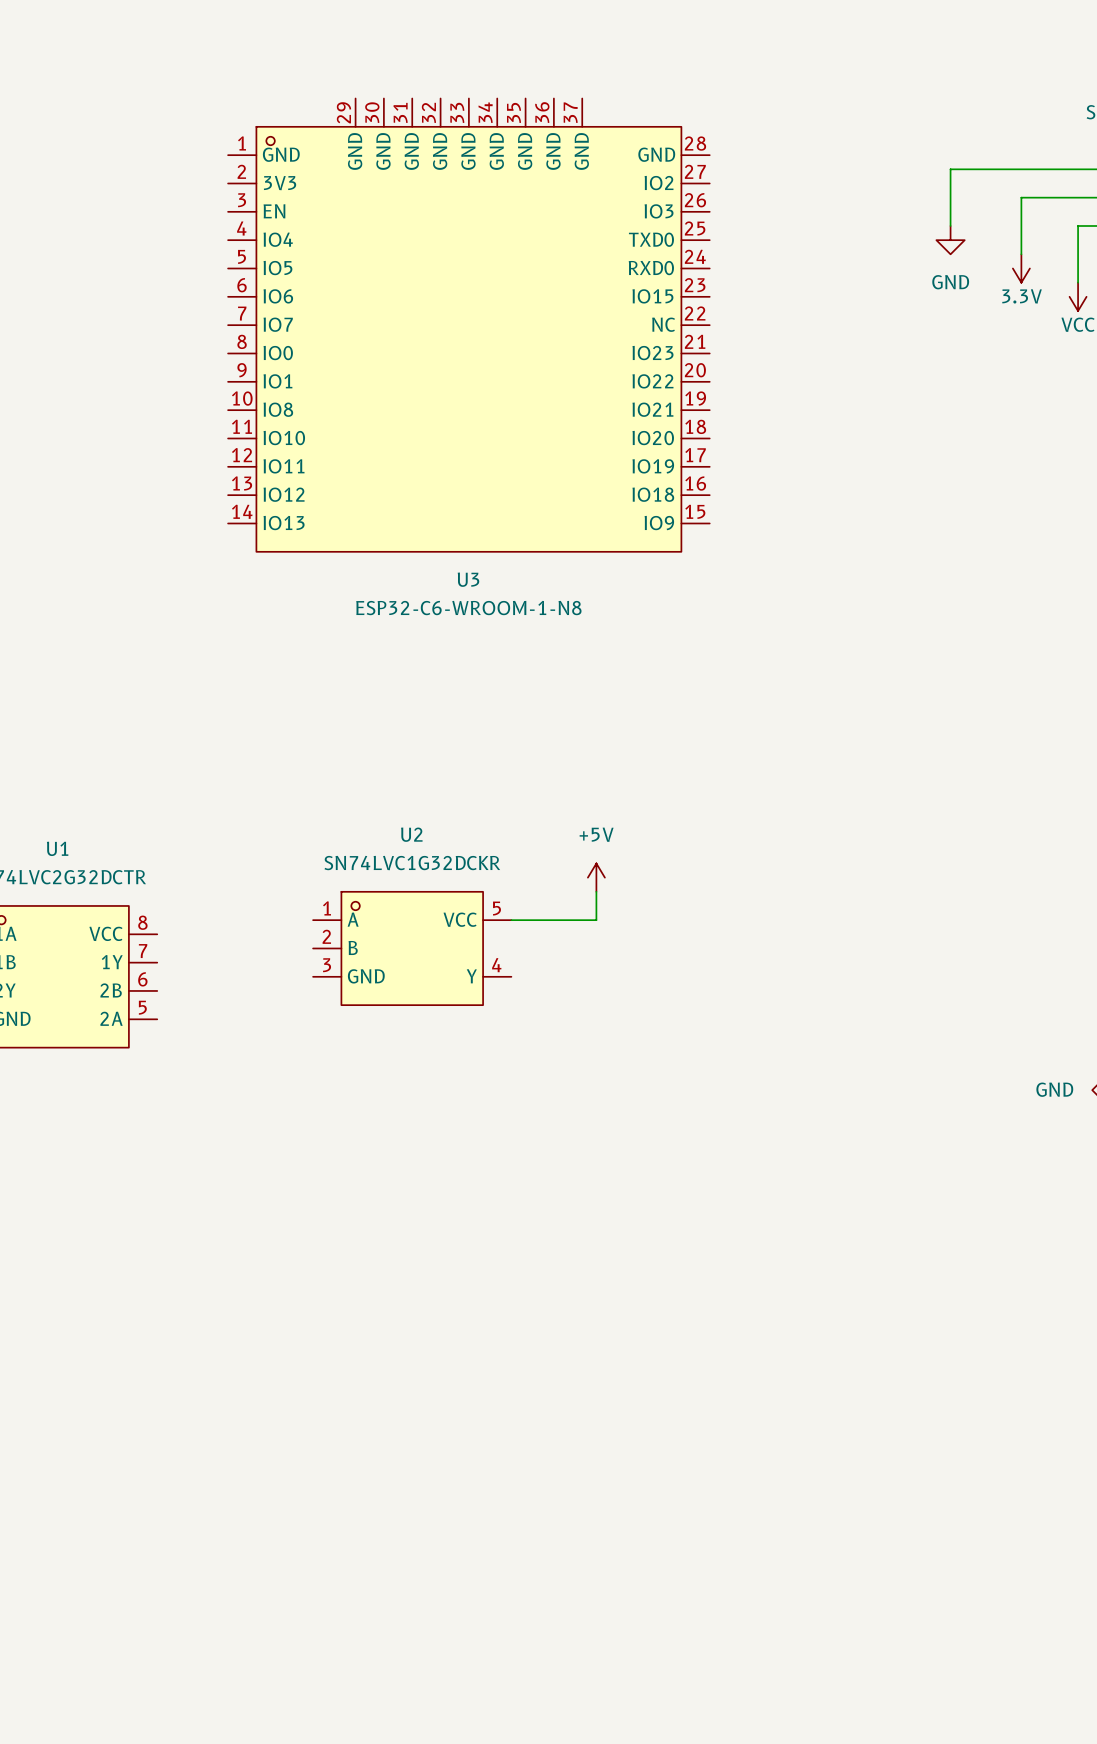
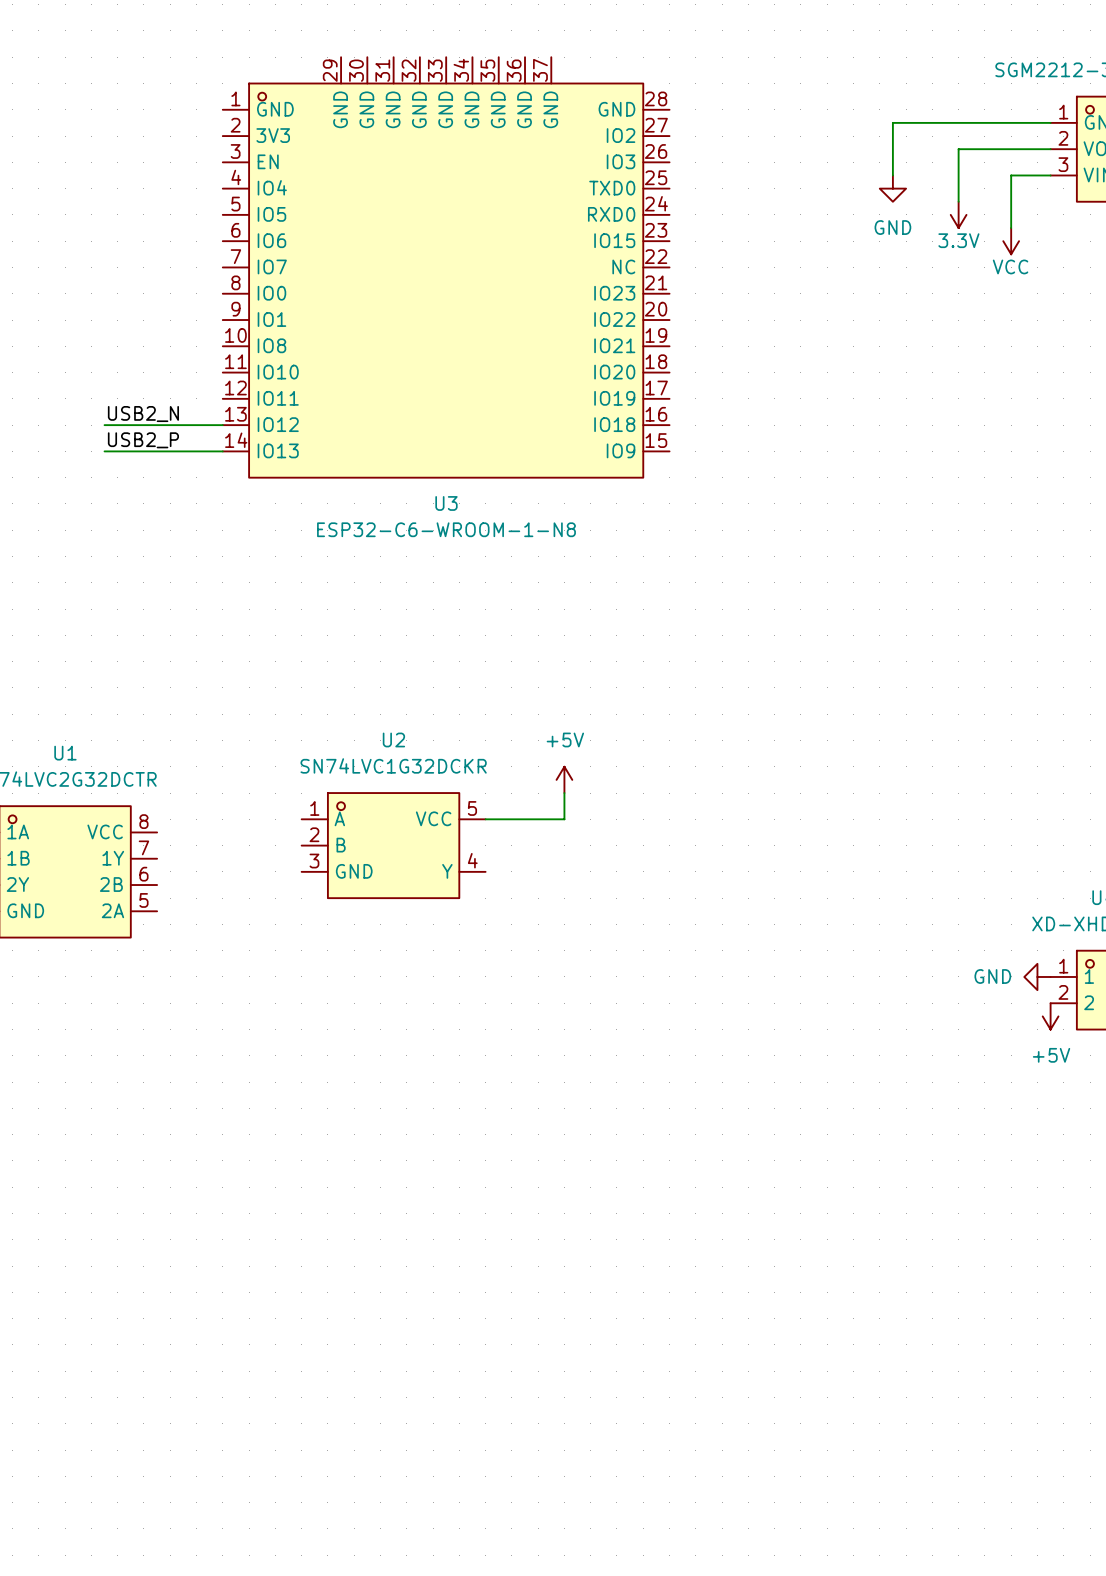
label: none -> USB2_N (143, 414)
wire: none -> (104, 425) (222, 425)
label: none -> USB2_P (143, 440)
wire: none -> (104, 451) (222, 451)

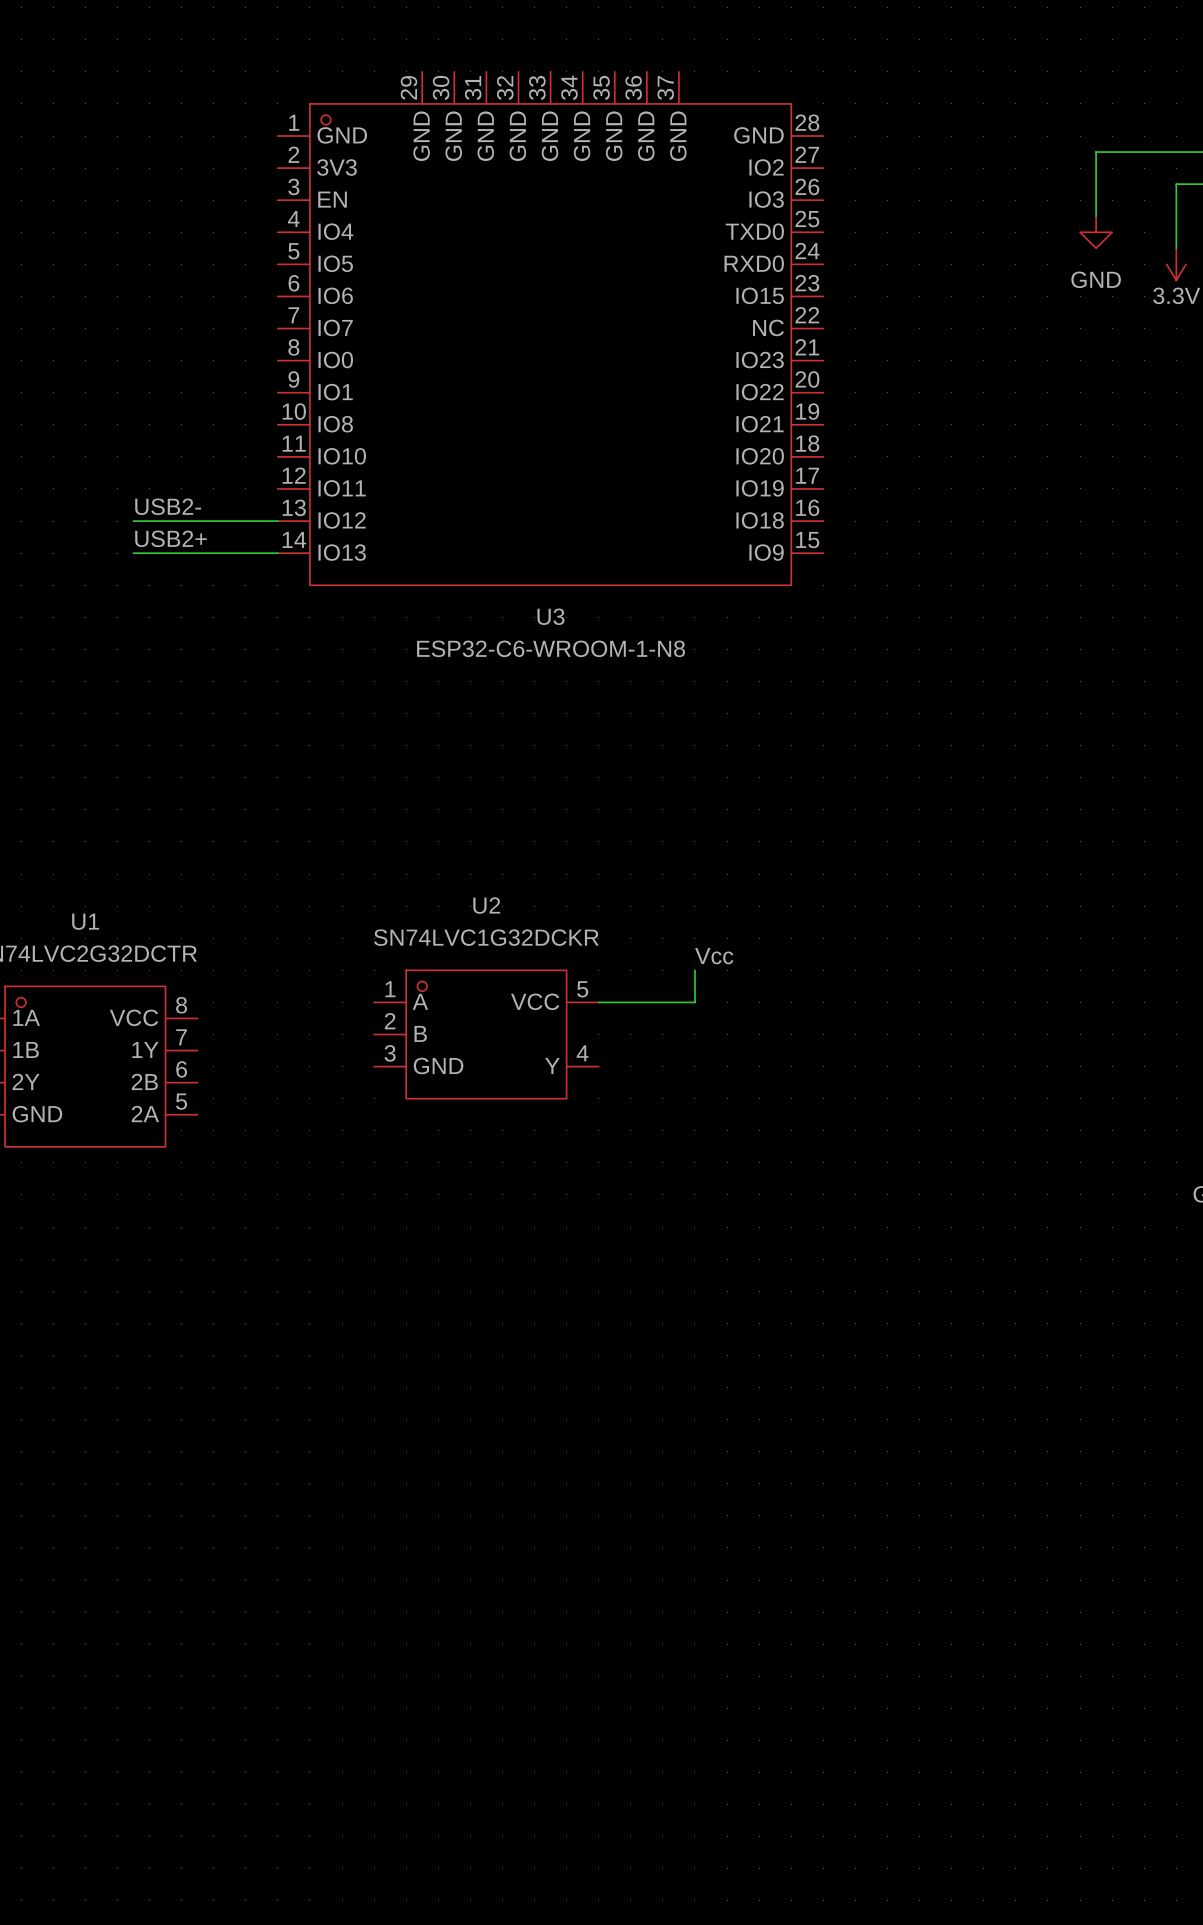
label: USB2_N (143, 414) -> USB2- (168, 506)
label: USB2_P (143, 440) -> USB2+ (171, 538)
power symbol: +5V (564, 779) -> none
label: none -> Vcc (714, 956)

